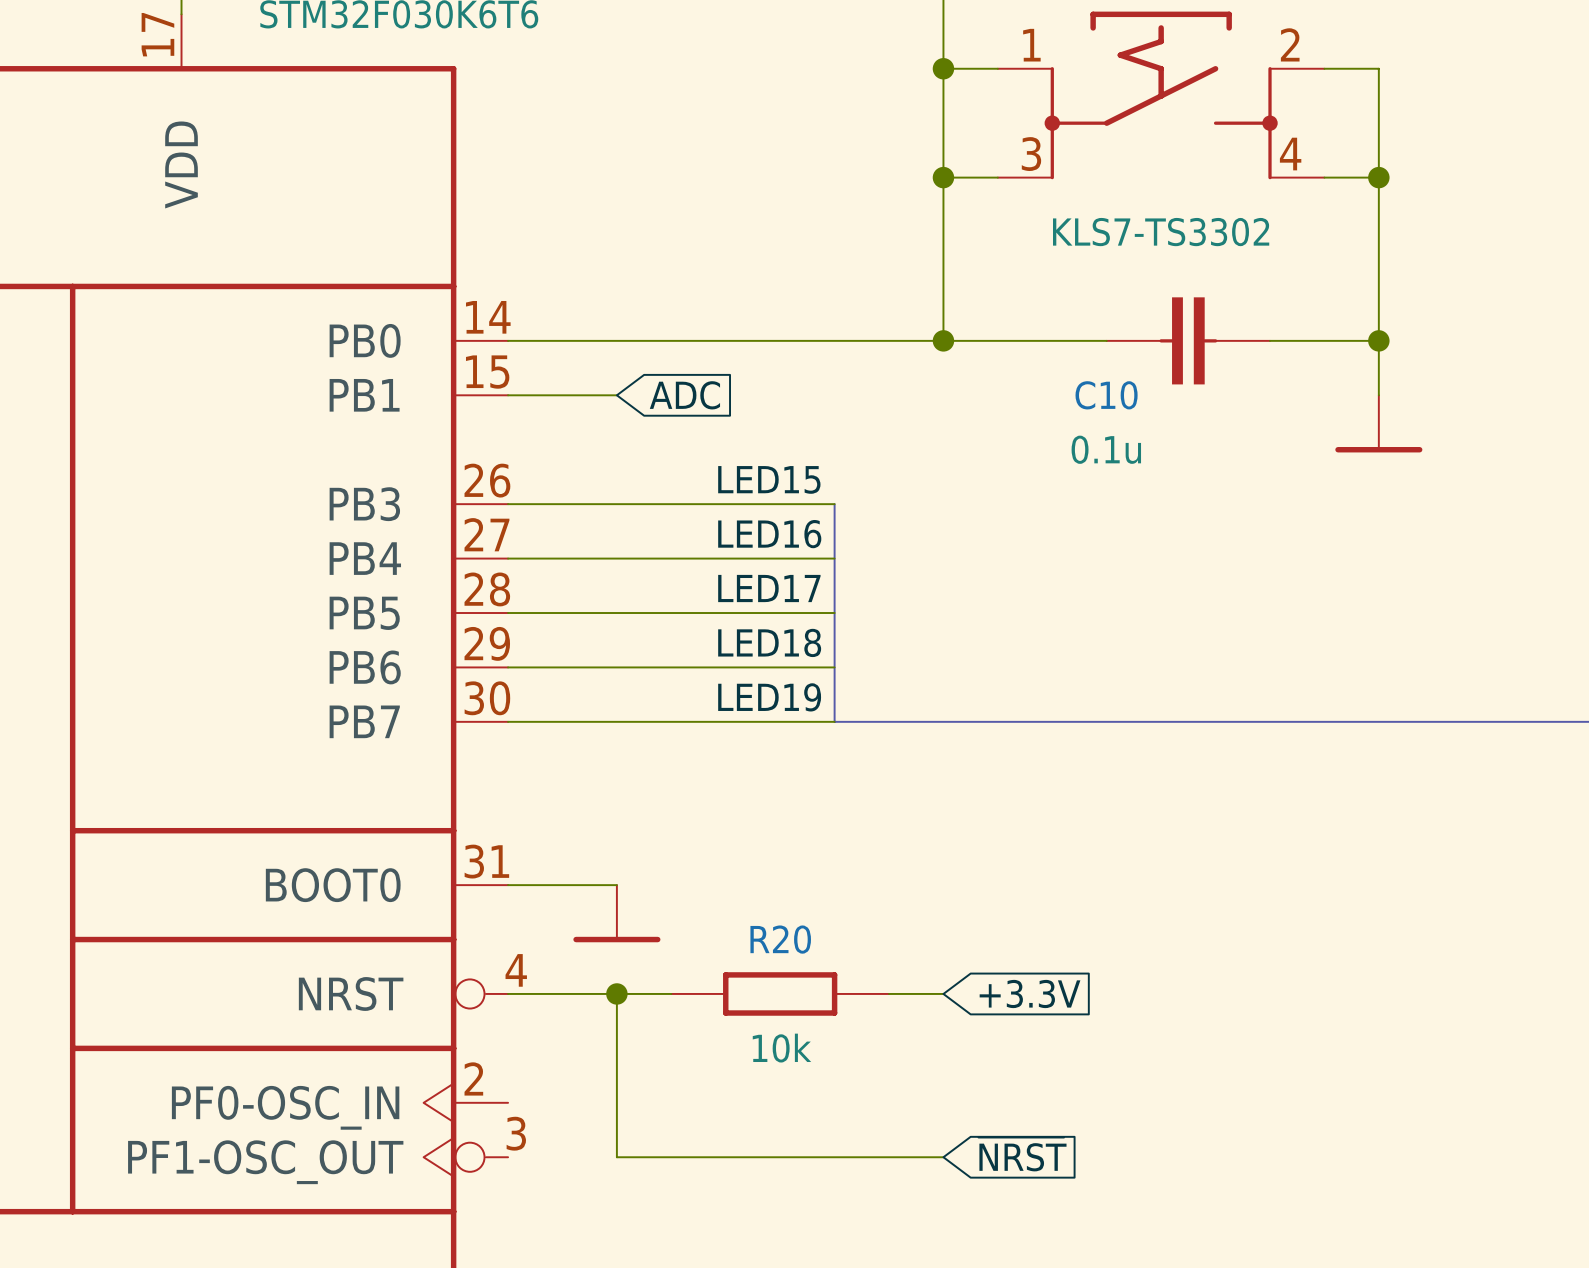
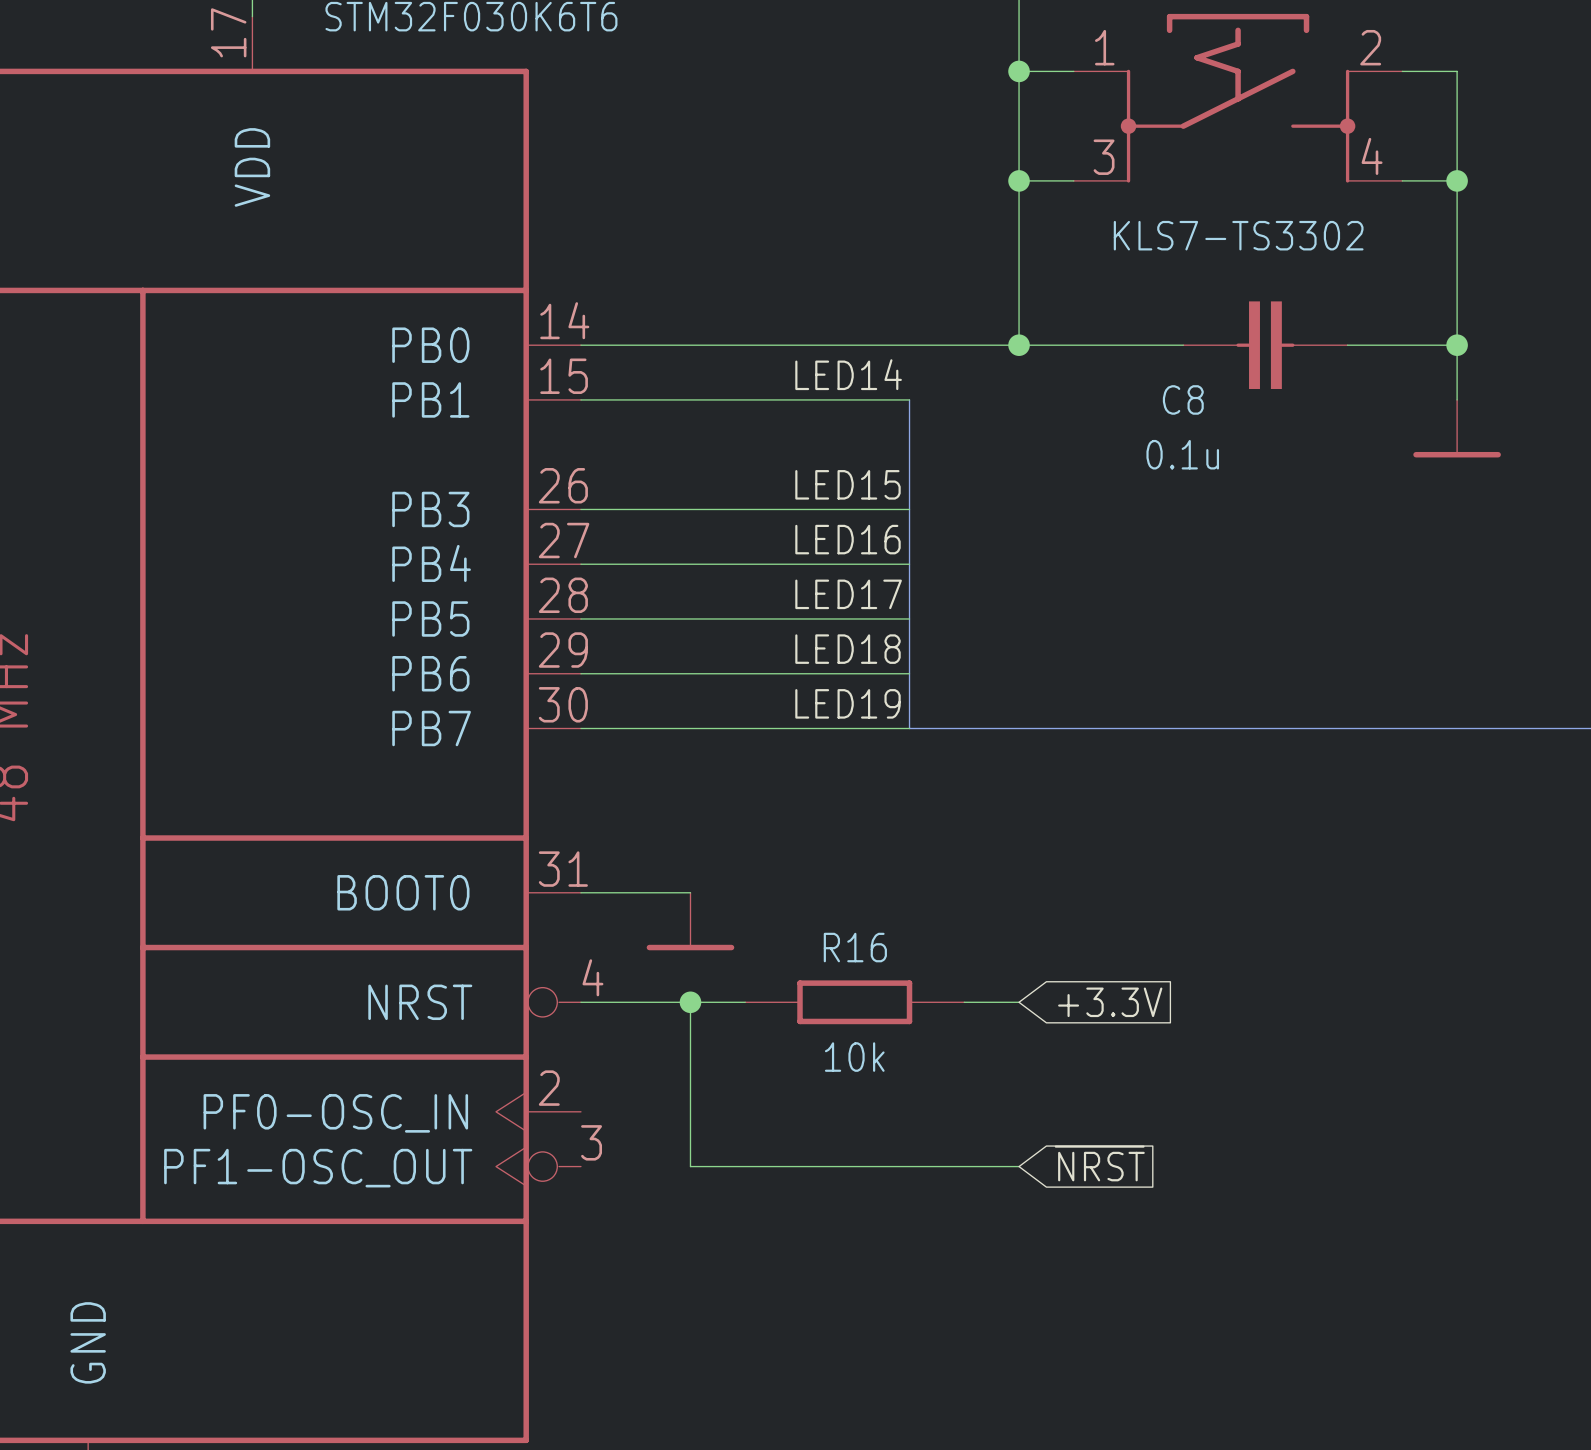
label: none -> LED14 (848, 374)
wire: none -> (690, 399) (909, 399)
global label: ADC (684, 395) -> none
bus: none -> (909, 399) (909, 509)
C10 name: C10 (1106, 395) -> C8 (1183, 399)
R20 name: R20 (780, 939) -> R16 (855, 947)

